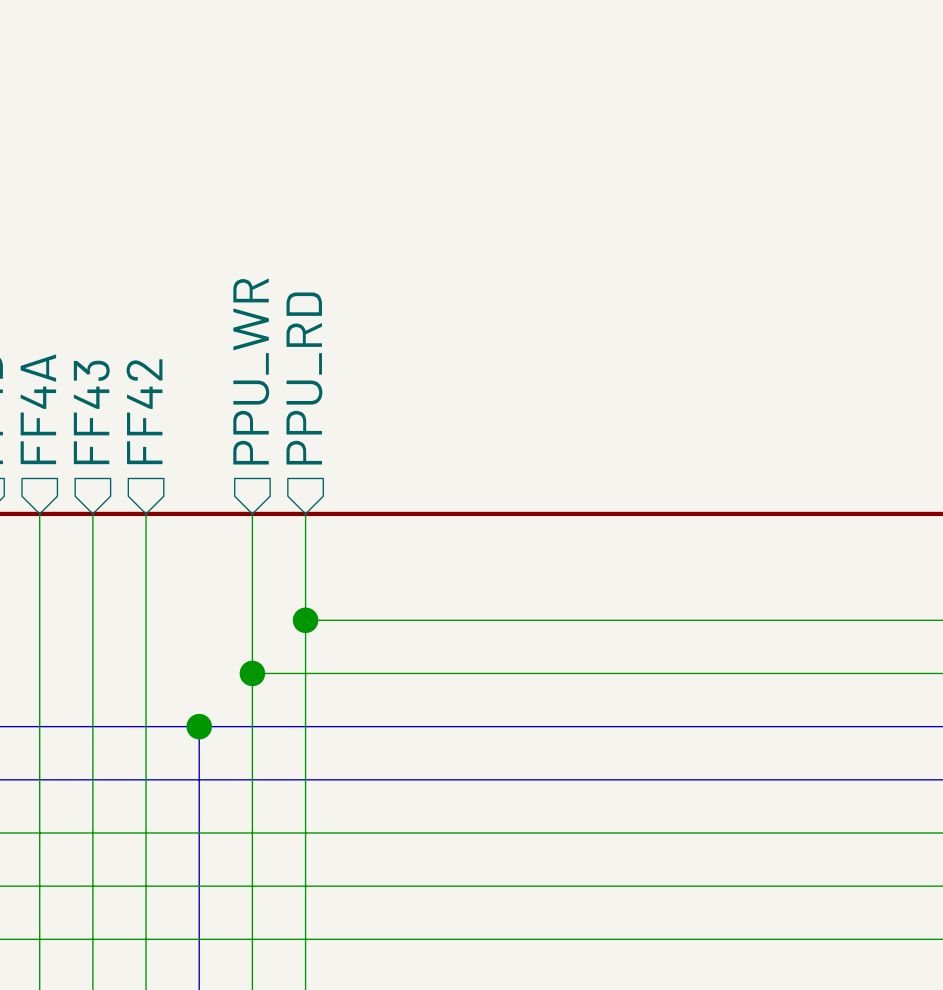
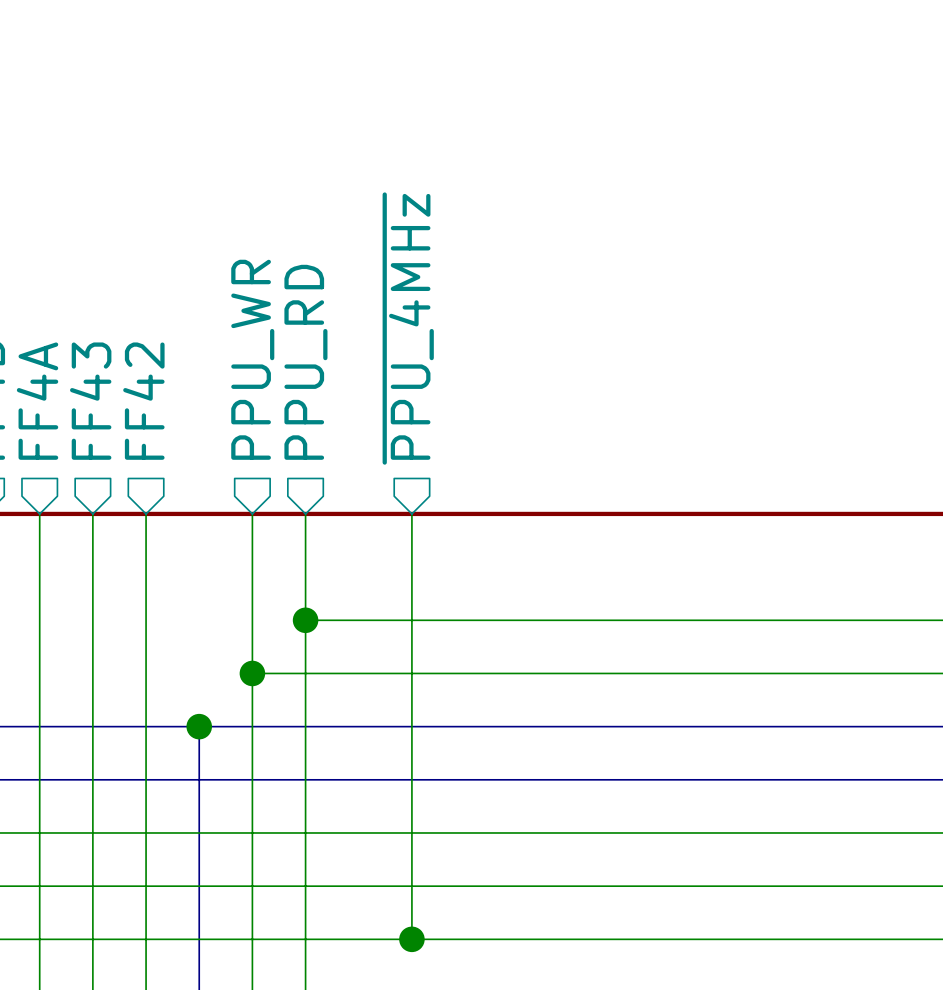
sheet pin: none -> ~{PPU_4MHz} (408, 328)
wire: none -> (411, 513) (411, 939)
junction: none -> (411, 939)

